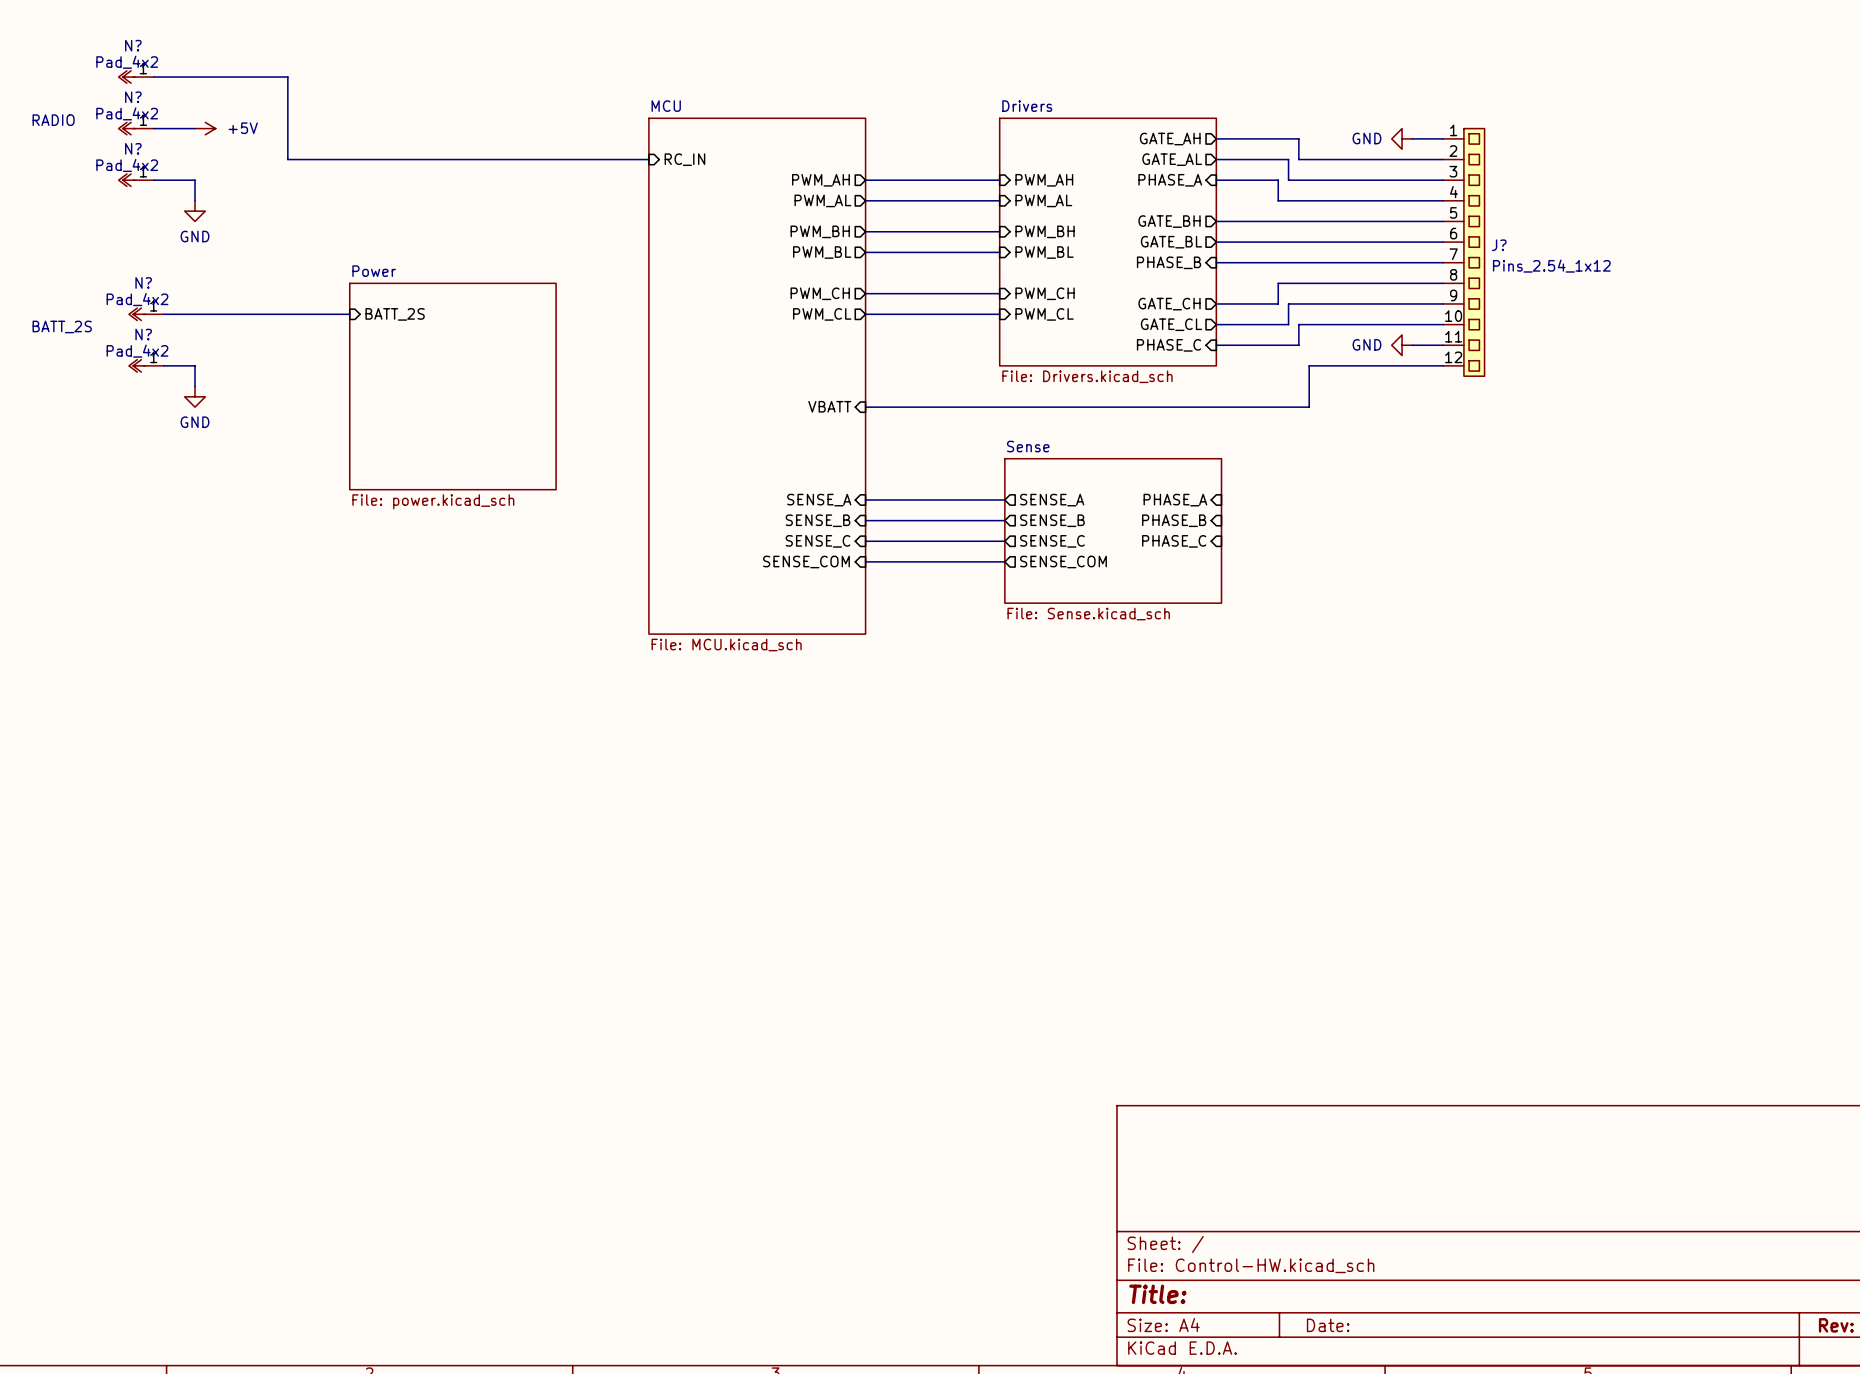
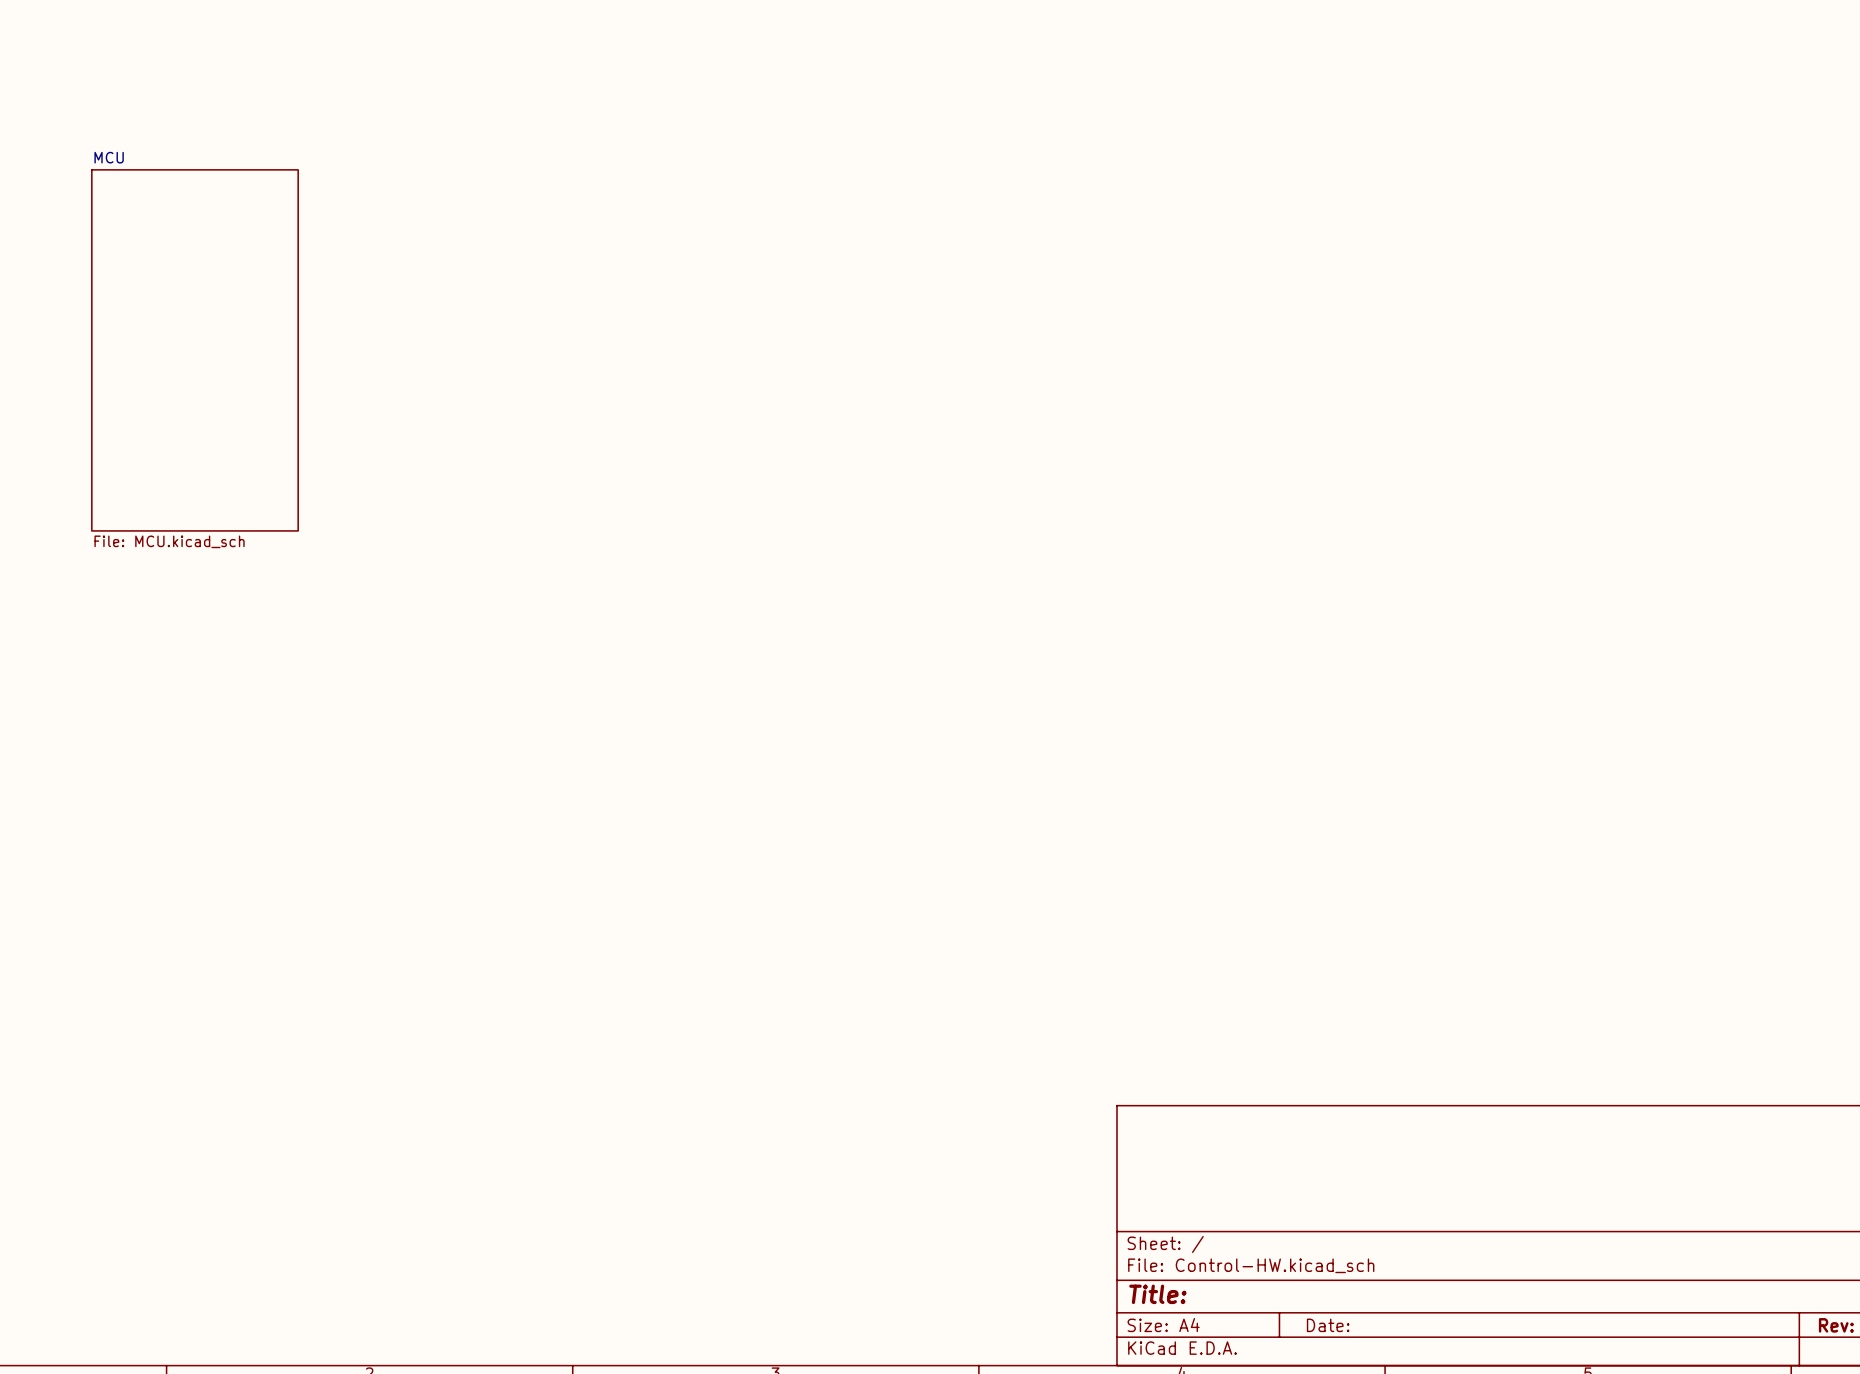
N?: Pad_4x2 (136, 77) -> none
wire: (153, 77) (287, 77) (287, 159) (648, 159) -> none
text: RADIO (53, 120) -> none
N?: Pad_4x2 (136, 128) -> none
wire: (153, 128) (195, 128) -> none
power symbol: +5V (205, 128) -> none
wire: (1216, 138) (1298, 138) (1298, 159) (1443, 159) -> none
power symbol: GND (1402, 138) -> none
wire: (1412, 138) (1443, 138) -> none
sheet pin: GATE_AH (1170, 139) -> none
sheet pin: RC_IN (684, 159) -> none
sheet pin: GATE_AL (1172, 159) -> none
wire: (1216, 159) (1288, 159) (1288, 180) (1443, 180) -> none
N?: Pad_4x2 (136, 180) -> none
wire: (153, 180) (195, 180) (195, 200) -> none
sheet pin: PWM_AH (820, 180) -> none
wire: (865, 180) (999, 180) -> none
sheet pin: PWM_AH (1044, 180) -> none
sheet pin: PHASE_A (1170, 180) -> none
wire: (1216, 180) (1278, 180) (1278, 200) (1443, 200) -> none
sheet pin: PWM_AL (822, 200) -> none
wire: (865, 200) (999, 200) -> none
sheet pin: PWM_AL (1043, 200) -> none
power symbol: GND (195, 211) -> none
sheet pin: GATE_BH (1169, 221) -> none
wire: (1216, 221) (1443, 221) -> none
sheet pin: PWM_BH (820, 231) -> none
wire: (865, 231) (999, 231) -> none
sheet pin: PWM_BH (1045, 231) -> none
sheet Drivers: File: Drivers.kicad_sch (1108, 242) -> none
sheet pin: GATE_BL (1171, 242) -> none
wire: (1216, 242) (1443, 242) -> none
sheet pin: PWM_BL (822, 252) -> none
wire: (865, 252) (999, 252) -> none
sheet pin: PWM_BL (1044, 252) -> none
J?: Pins_2.54_1x12 (1464, 252) -> none
sheet pin: PHASE_B (1169, 262) -> none
wire: (1216, 262) (1443, 262) -> none
wire: (1443, 283) (1278, 283) (1278, 303) (1216, 303) -> none
sheet pin: PWM_CH (820, 293) -> none
wire: (865, 293) (999, 293) -> none
sheet pin: PWM_CH (1045, 293) -> none
wire: (1443, 303) (1288, 303) (1288, 324) (1216, 324) -> none
sheet pin: GATE_CH (1169, 304) -> none
N?: Pad_4x2 (146, 314) -> none
wire: (164, 314) (349, 314) -> none
sheet pin: BATT_2S (395, 314) -> none
sheet pin: PWM_CL (822, 314) -> none
wire: (865, 314) (999, 314) -> none
sheet pin: PWM_CL (1044, 314) -> none
sheet pin: GATE_CL (1171, 324) -> none
wire: (1443, 324) (1298, 324) (1298, 345) (1216, 345) -> none
text: BATT_2S (62, 326) -> none
sheet pin: PHASE_C (1169, 345) -> none
power symbol: GND (1402, 345) -> none
wire: (1412, 345) (1443, 345) -> none
sheet MCU: none -> File: MCU.kicad_sch (195, 350)
N?: Pad_4x2 (146, 365) -> none
wire: (164, 365) (195, 365) (195, 386) -> none
wire: (1443, 365) (1309, 365) (1309, 407) (865, 407) -> none
sheet MCU: File: MCU.kicad_sch (757, 376) -> none
sheet Power: File: power.kicad_sch (452, 386) -> none
power symbol: GND (195, 396) -> none
sheet pin: VBATT (829, 406) -> none
wire: (865, 499) (1004, 499) -> none
sheet pin: SENSE_A (819, 500) -> none
sheet pin: SENSE_A (1052, 500) -> none
sheet pin: PHASE_A (1175, 500) -> none
sheet pin: SENSE_B (818, 520) -> none
wire: (865, 520) (1004, 520) -> none
sheet pin: SENSE_B (1052, 520) -> none
sheet pin: PHASE_B (1174, 520) -> none
sheet Sense: File: Sense.kicad_sch (1113, 530) -> none
sheet pin: SENSE_C (818, 541) -> none
wire: (865, 541) (1004, 541) -> none
sheet pin: SENSE_C (1052, 541) -> none
sheet pin: PHASE_C (1174, 541) -> none
wire: (865, 561) (1004, 561) -> none
sheet pin: SENSE_COM (806, 562) -> none
sheet pin: SENSE_COM (1063, 562) -> none

